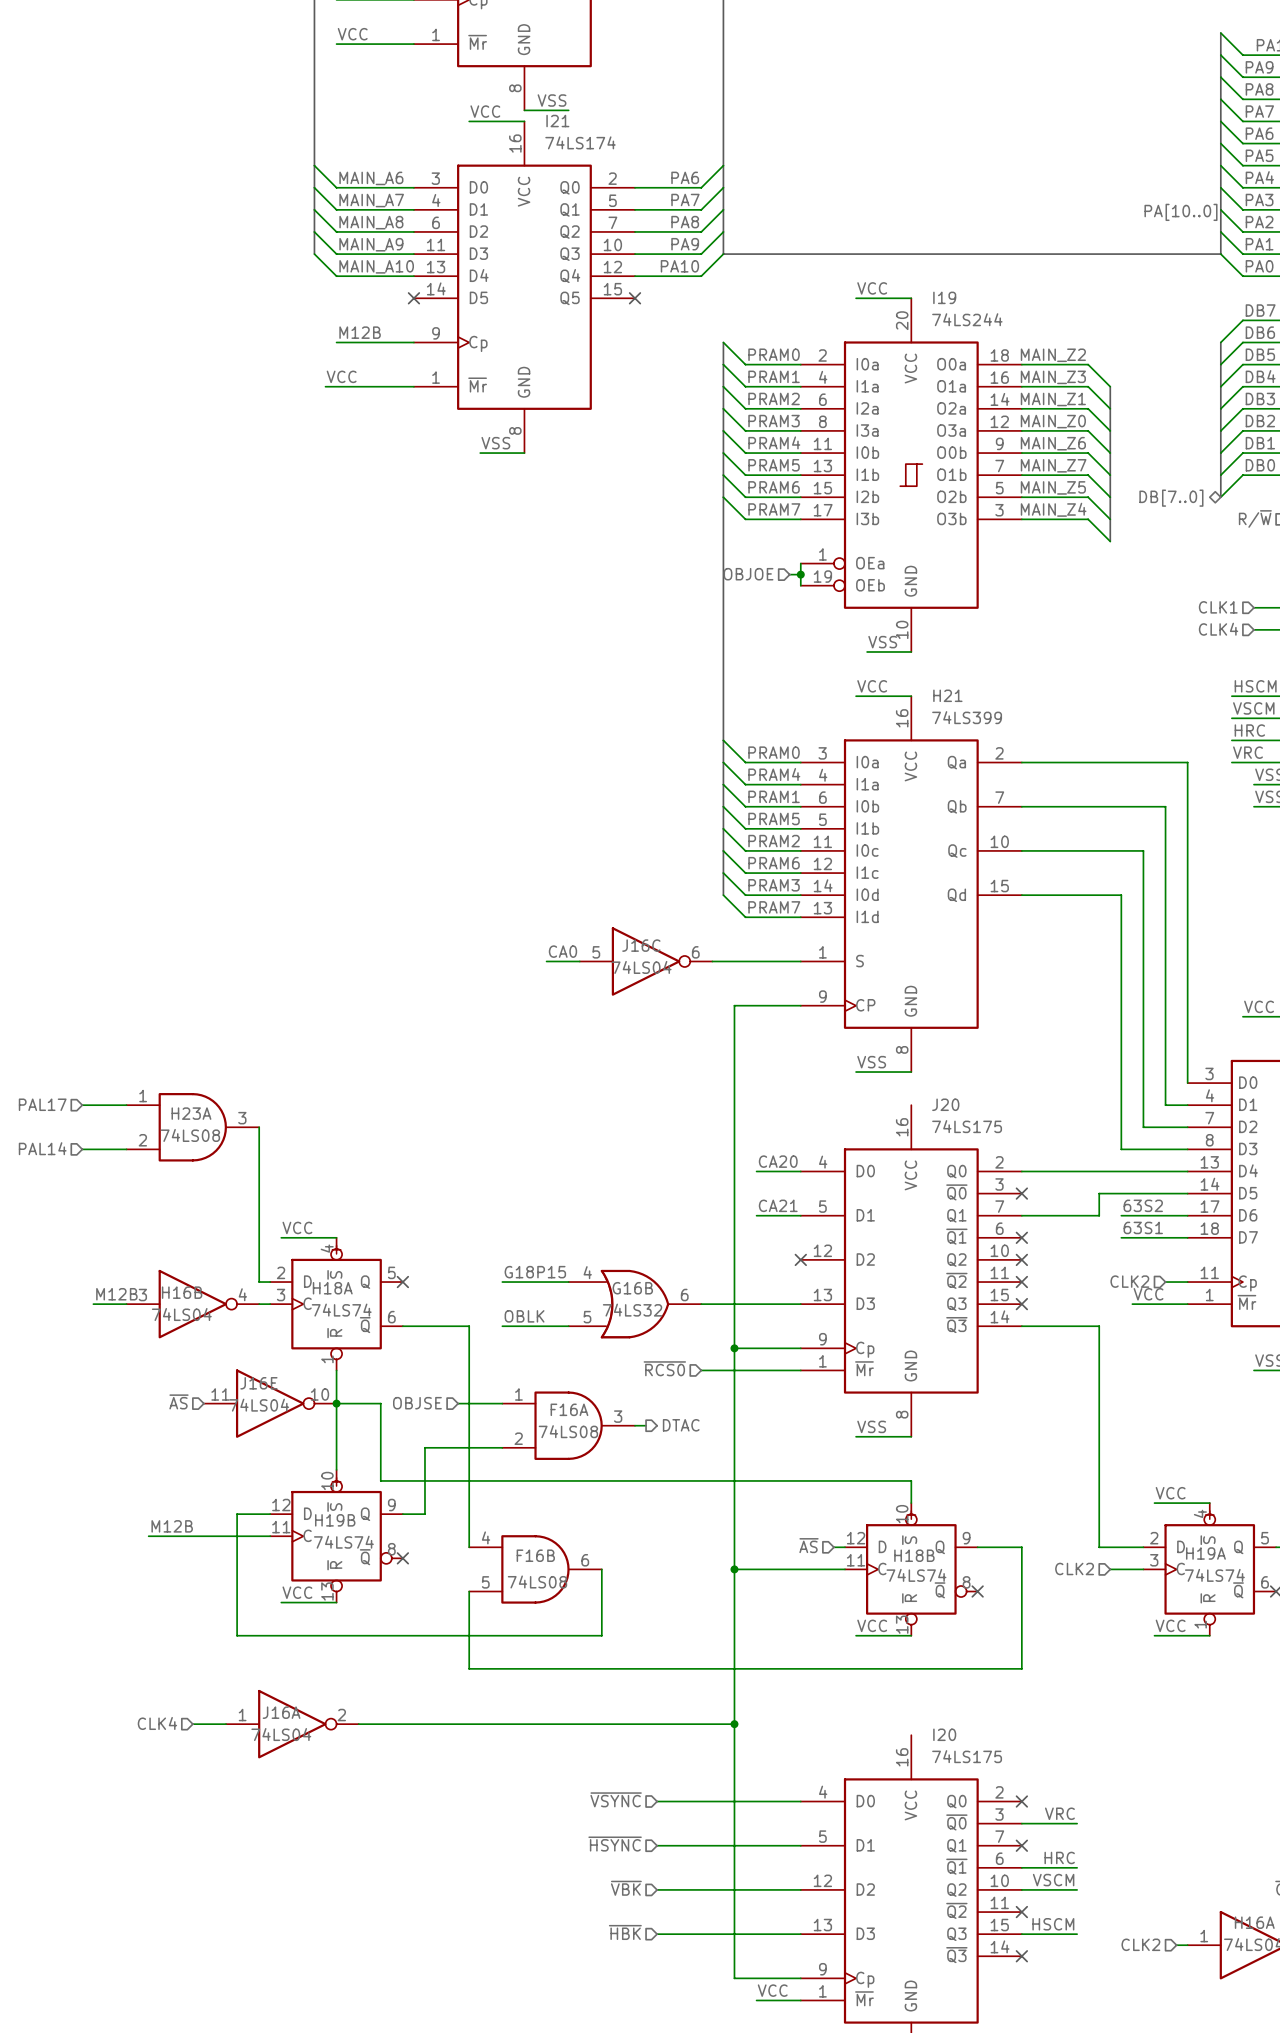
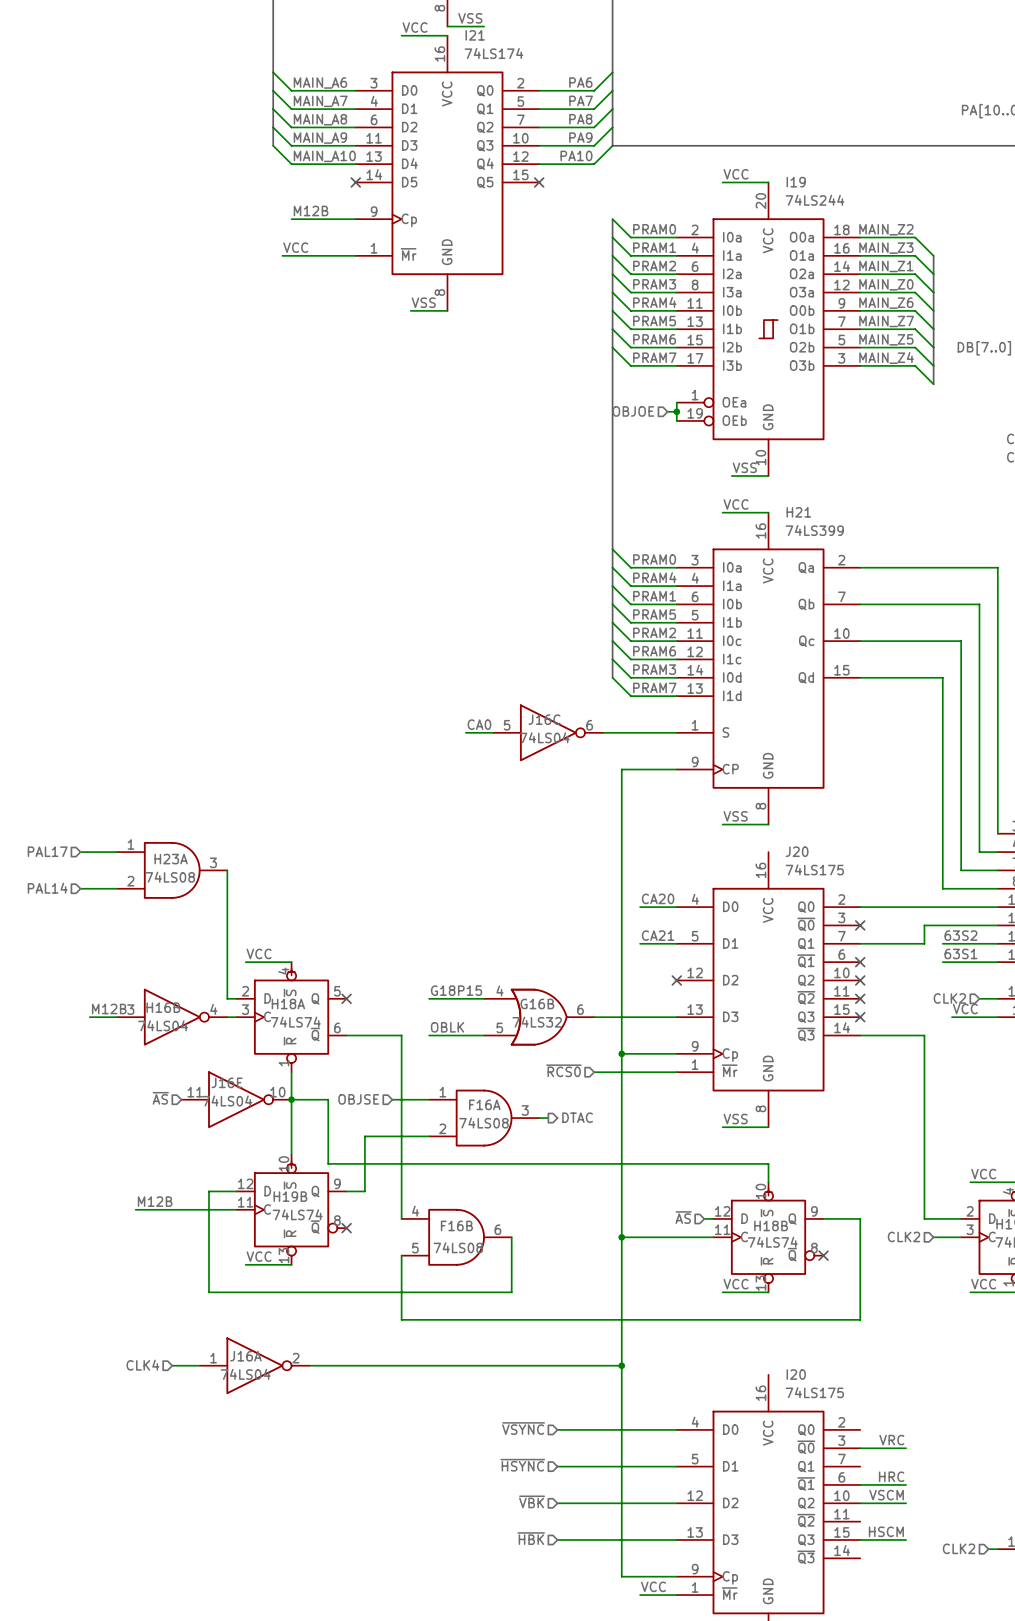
no-connect mark: (1021, 1801) -> none
no-connect mark: (1021, 1845) -> none
no-connect mark: (1021, 1912) -> none
no-connect mark: (1021, 1956) -> none

